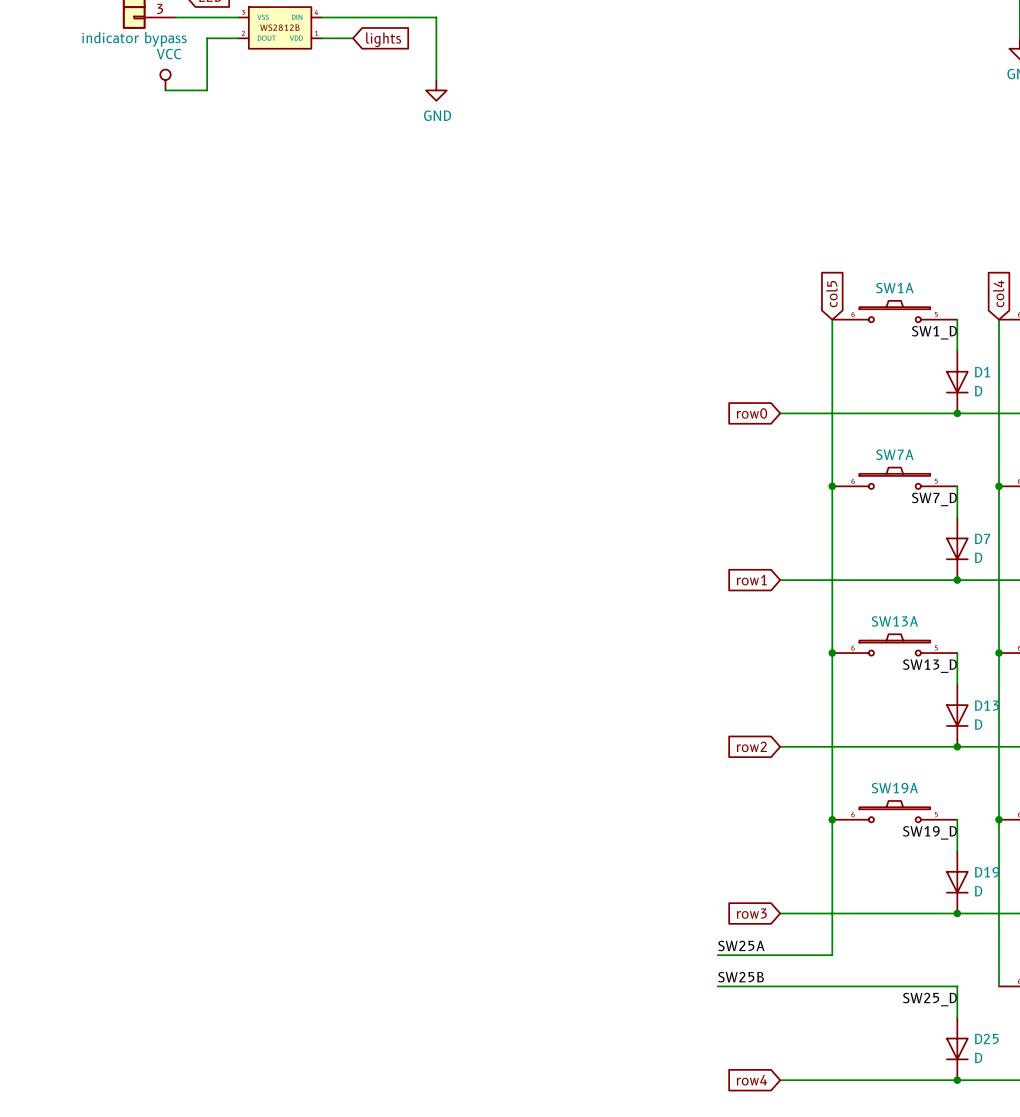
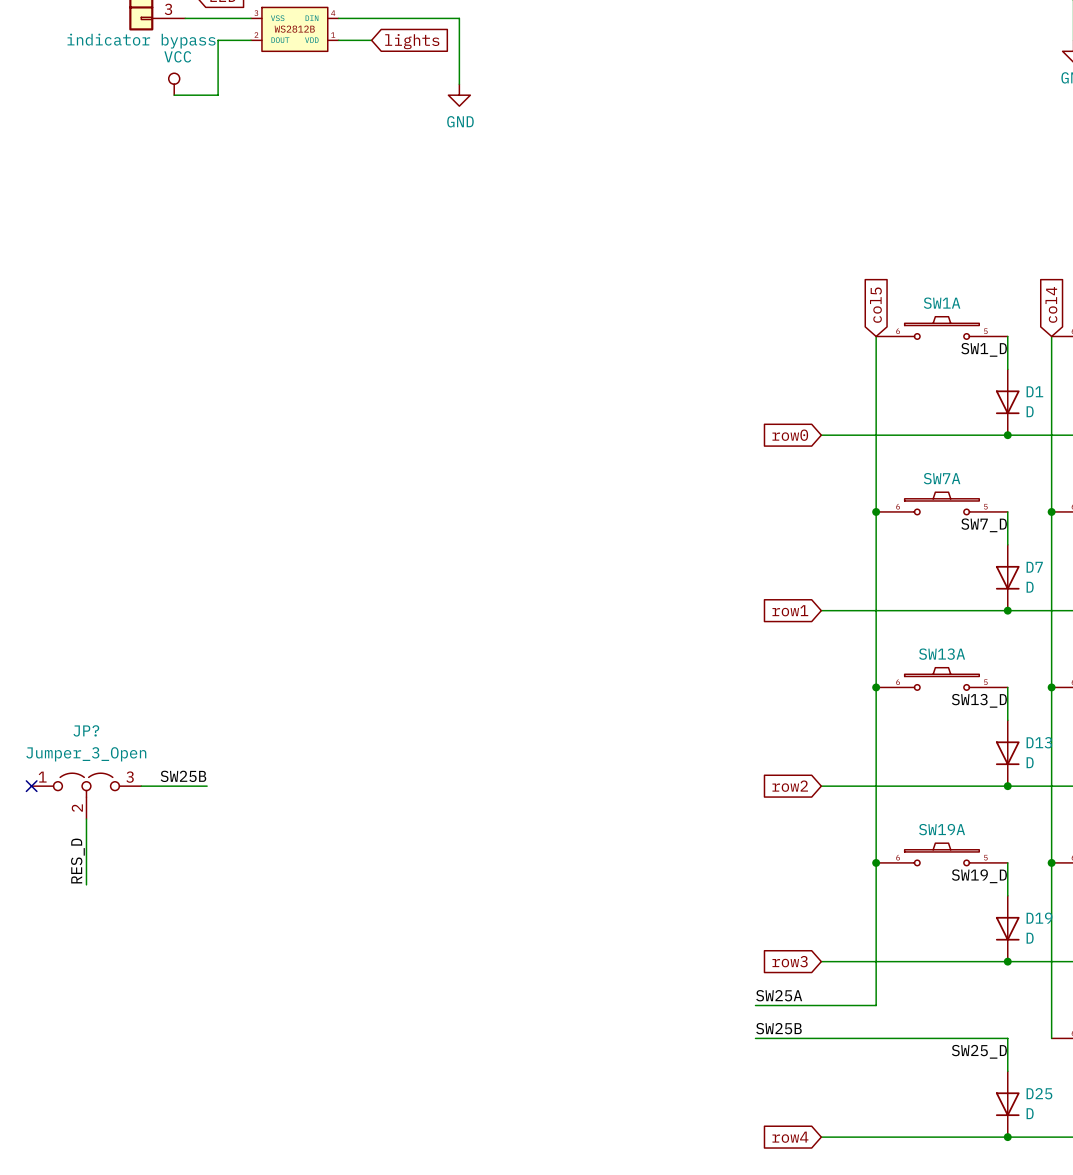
label: none -> SW25B (183, 776)
no-connect mark: none -> (31, 786)
wire: none -> (141, 786) (207, 786)
JP?: none -> Jumper_3_Open (86, 796)
wire: none -> (86, 819) (86, 884)
label: none -> RES_D (77, 861)

